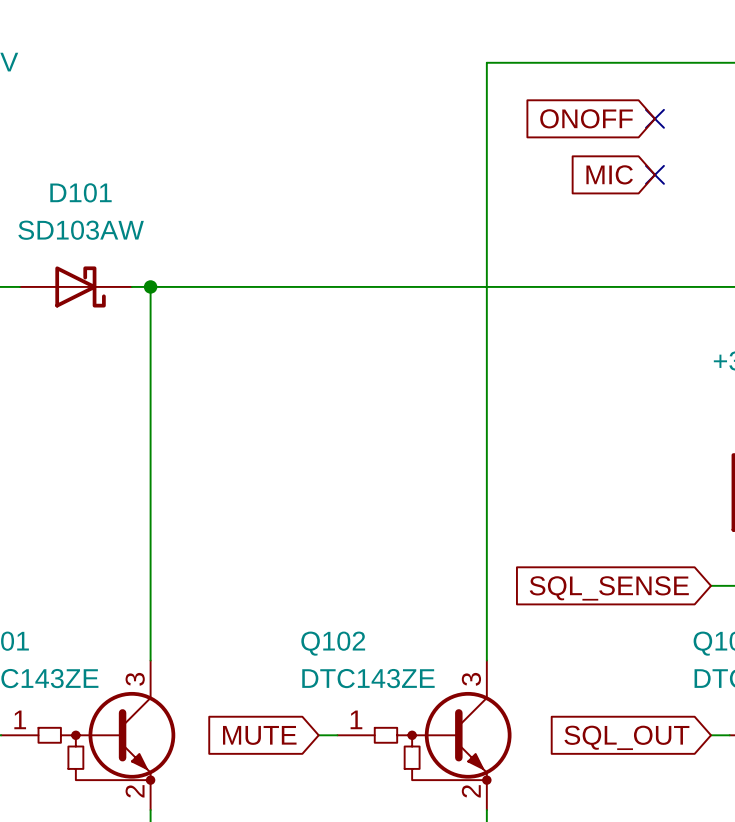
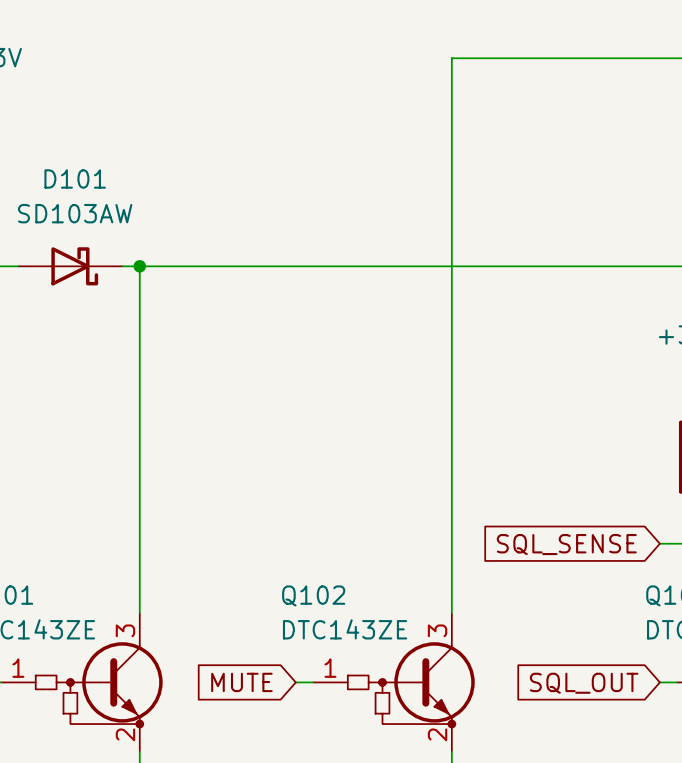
global label: ONOFF (586, 118) -> none
no-connect mark: (654, 118) -> none
global label: MIC (609, 174) -> none
no-connect mark: (654, 174) -> none

